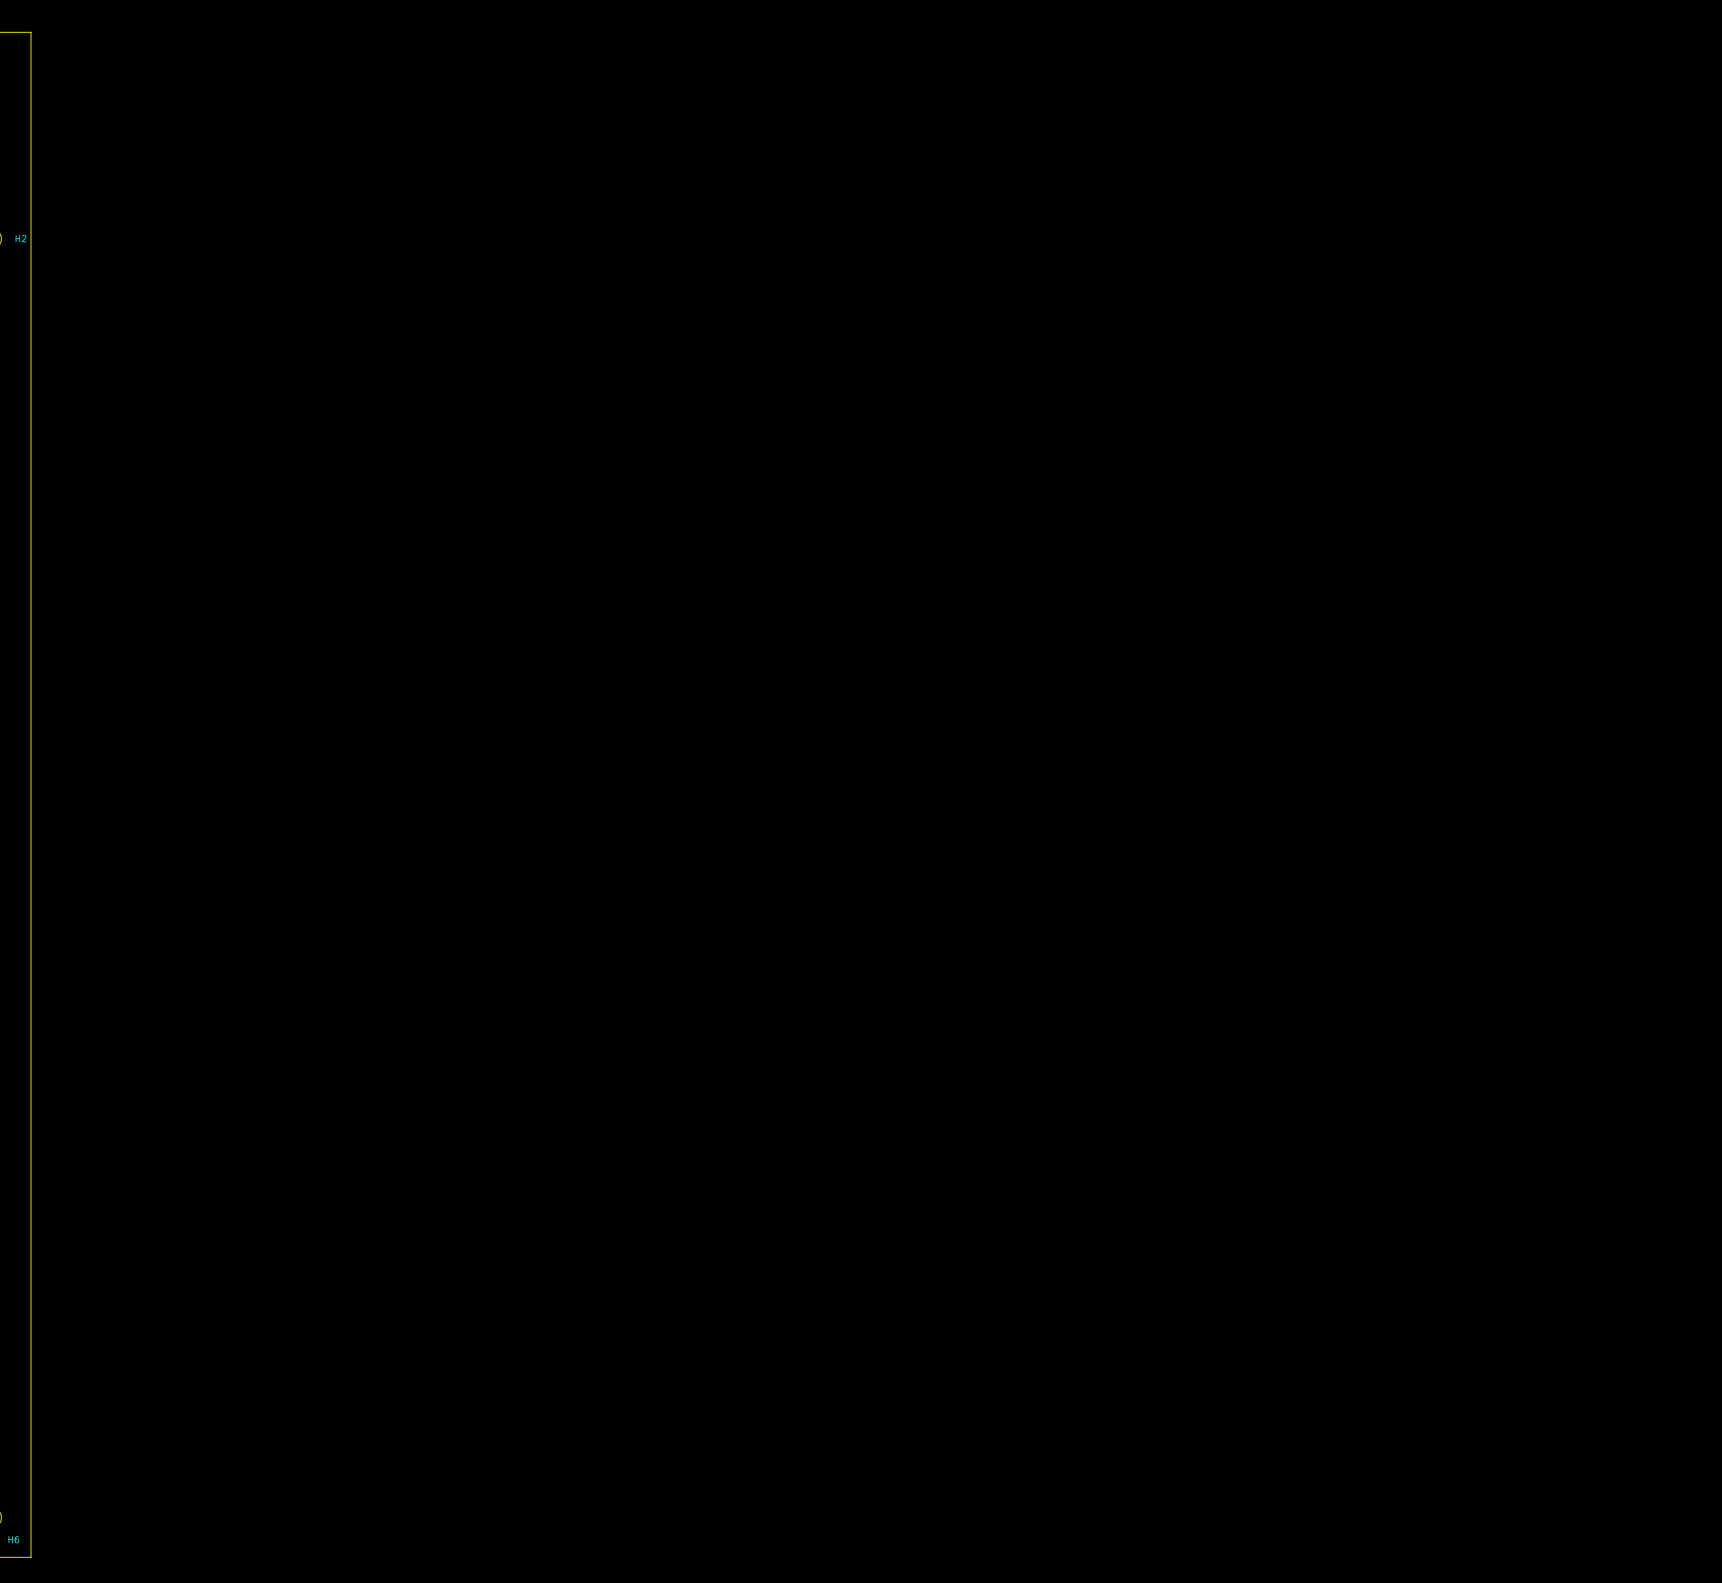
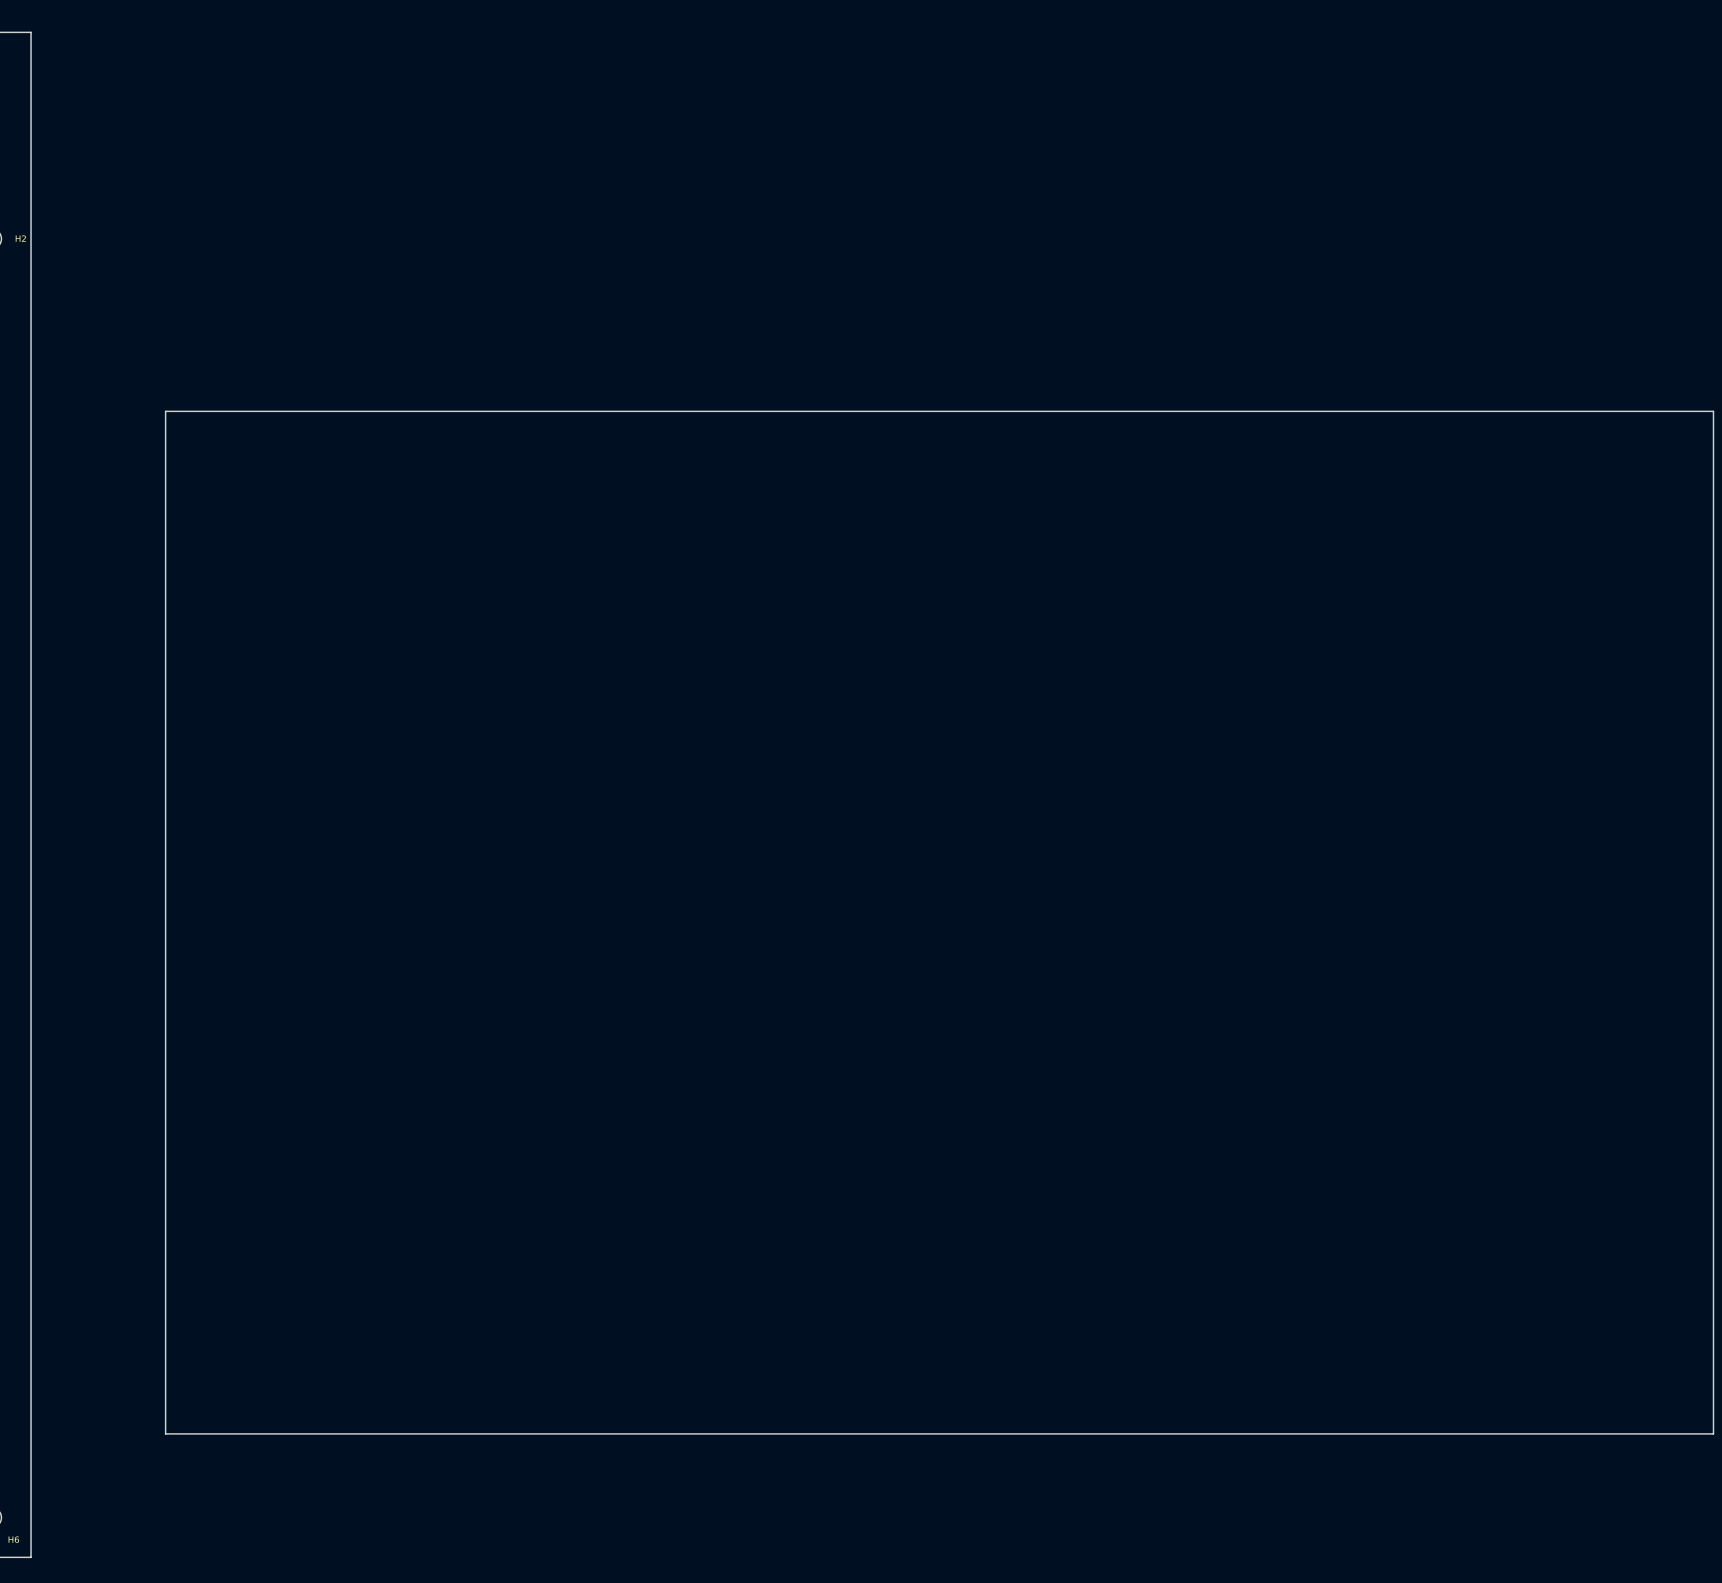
board edge: none -> (165, 411) (1713, 411) (1713, 1433) (165, 1433) (165, 411)

